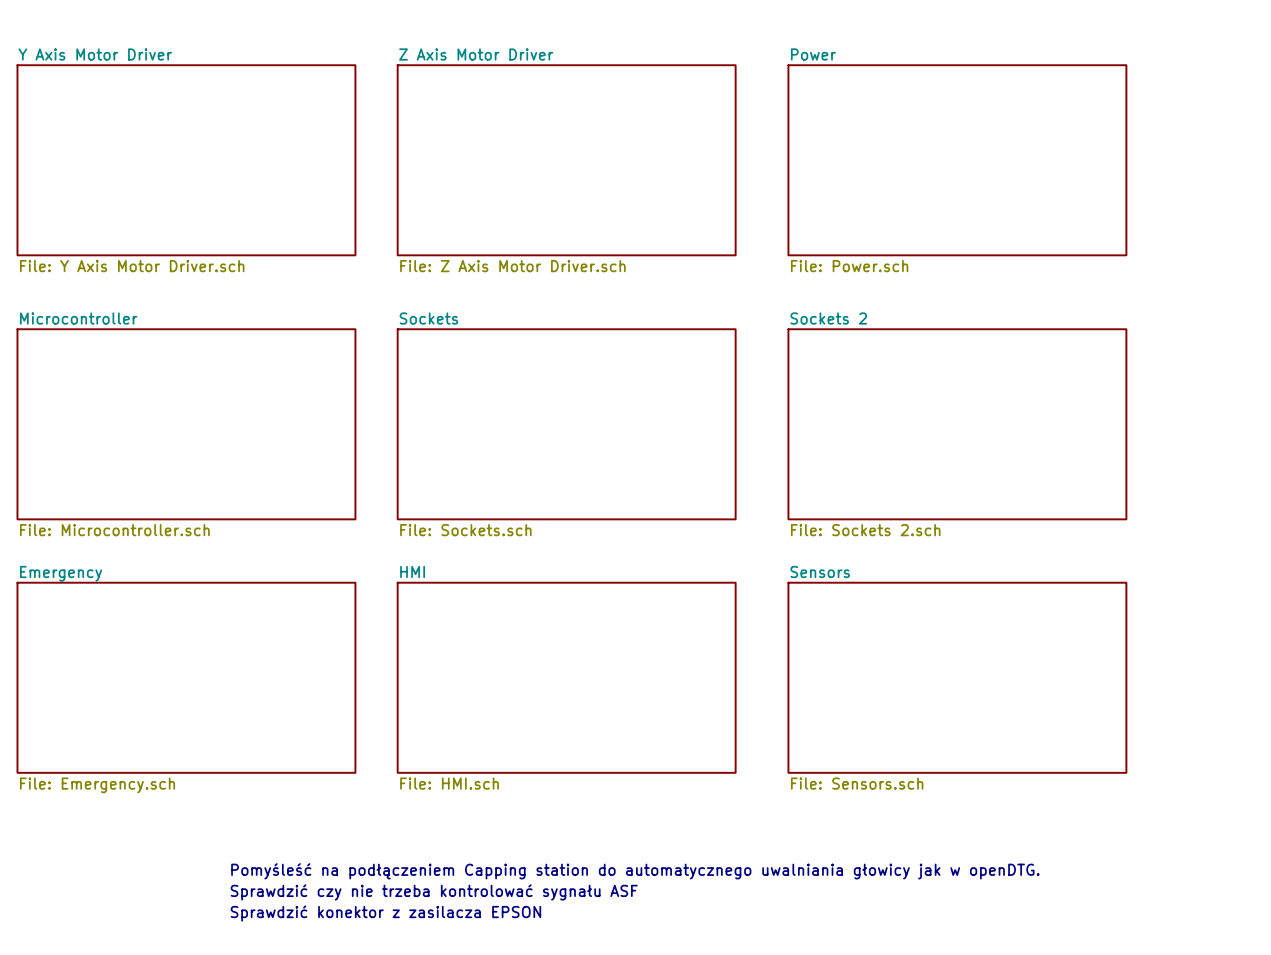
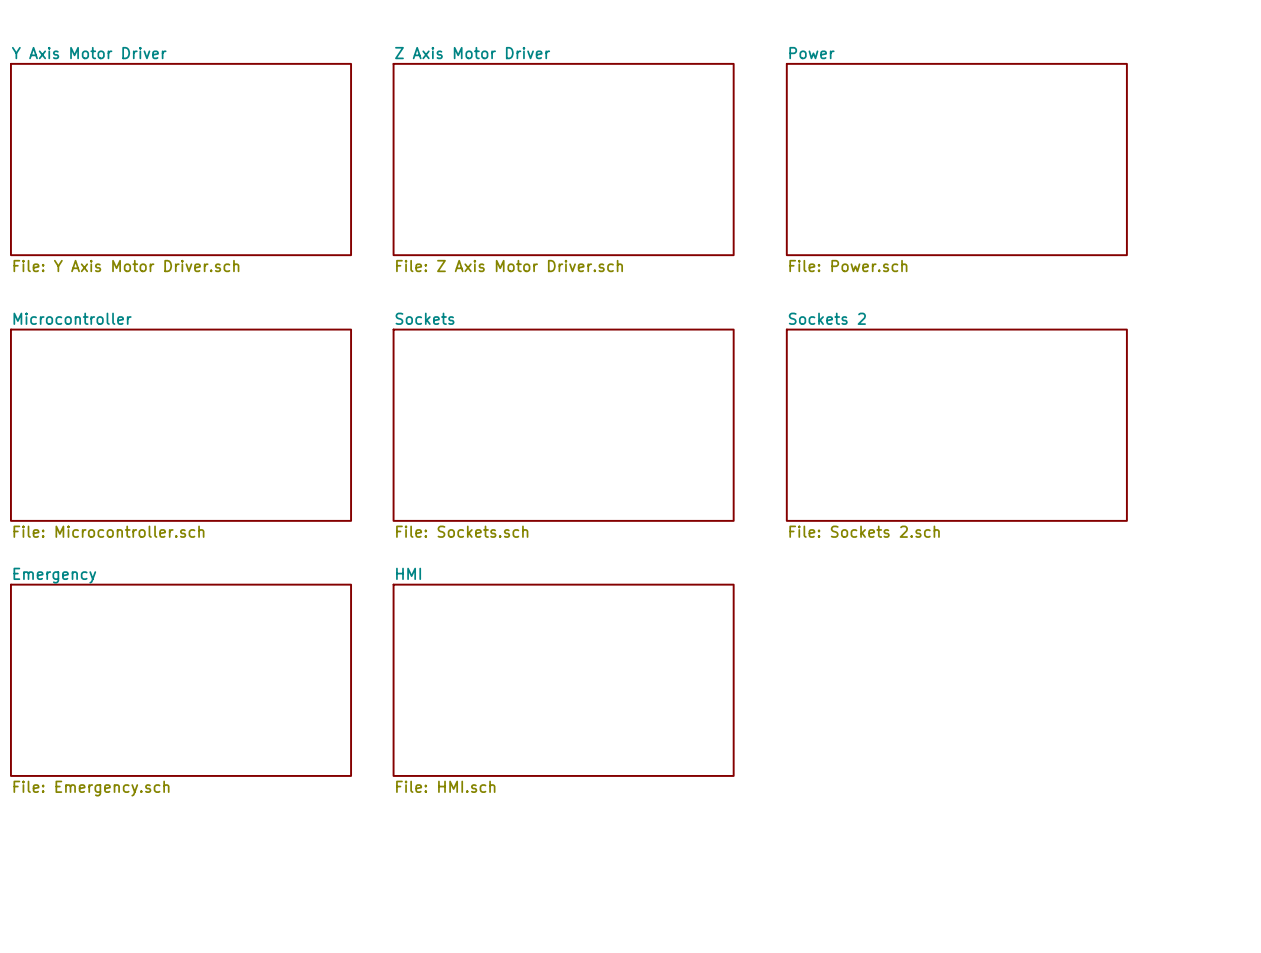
sheet Sensors: File: Sensors.sch (957, 677) -> none
text: Pomyśleść na podłączeniem Capping station do automatycznego uwalniania głowicy jak w openDTG. (635, 871) -> none
text: Sprawdzić czy nie trzeba kontrolować sygnału ASF (434, 892) -> none
text: Sprawdzić konektor z zasilacza EPSON (385, 913) -> none

